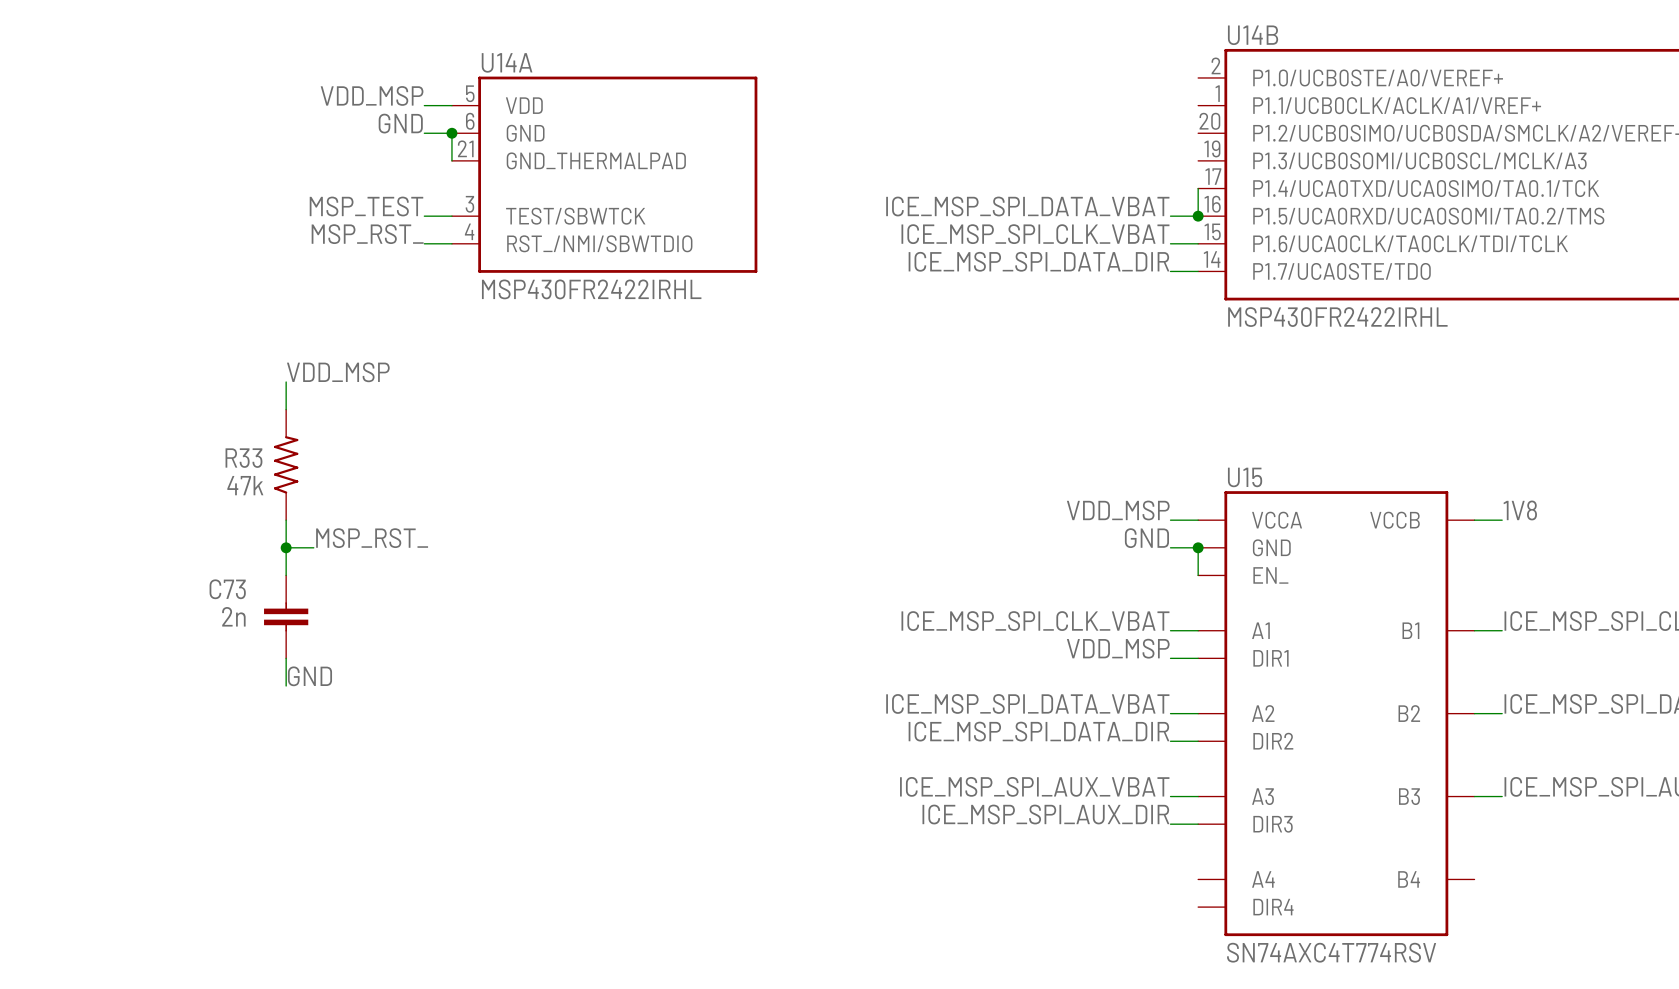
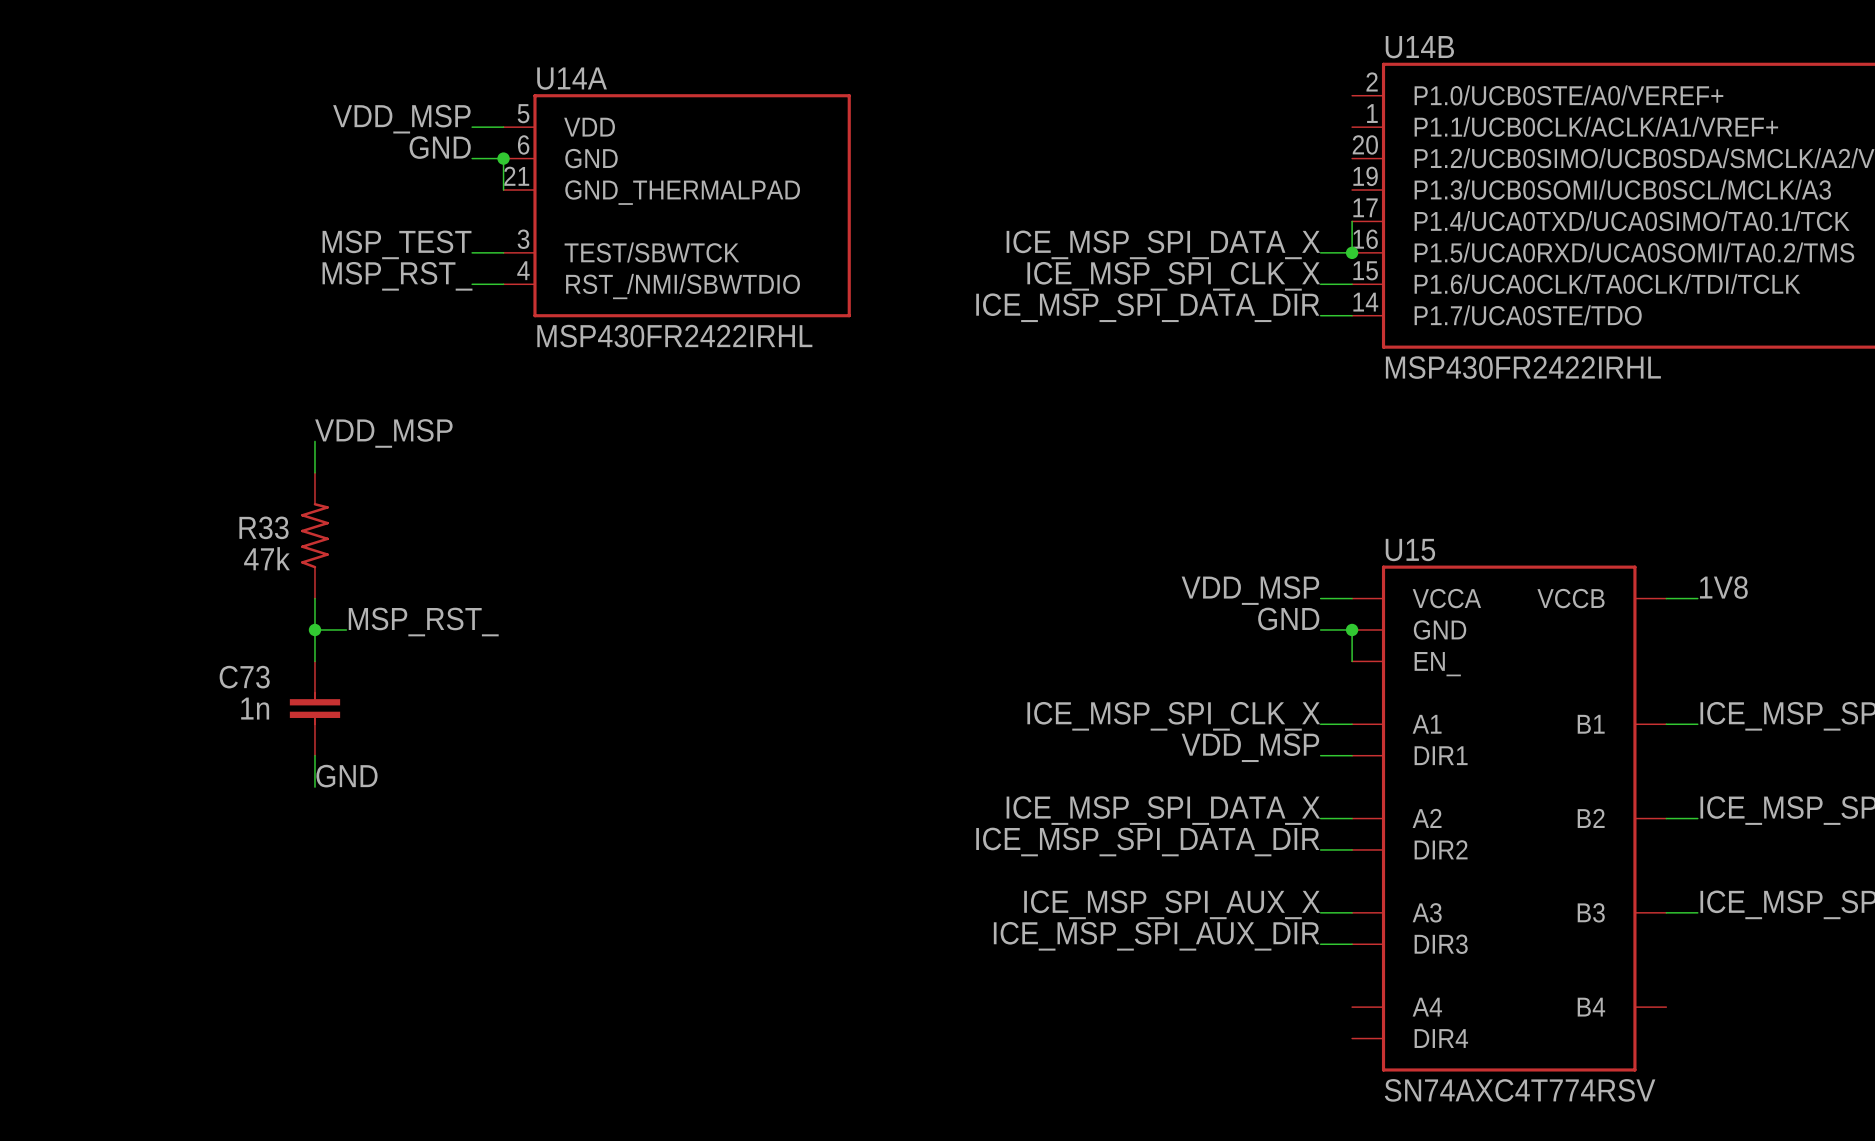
label: ICE_MSP_SPI_DATA_VBAT (1027, 206) -> ICE_MSP_SPI_DATA_X (1163, 244)
label: ICE_MSP_SPI_CLK_VBAT (1035, 234) -> ICE_MSP_SPI_CLK_X (1173, 276)
C73 value: 2n (233, 616) -> 1n (255, 708)
label: ICE_MSP_SPI_CLK_VBAT (1035, 621) -> ICE_MSP_SPI_CLK_X (1173, 716)
label: ICE_MSP_SPI_DATA_VBAT (1027, 703) -> ICE_MSP_SPI_DATA_X (1163, 810)
label: ICE_MSP_SPI_AUX_VBAT (1034, 786) -> ICE_MSP_SPI_AUX_X (1172, 904)

